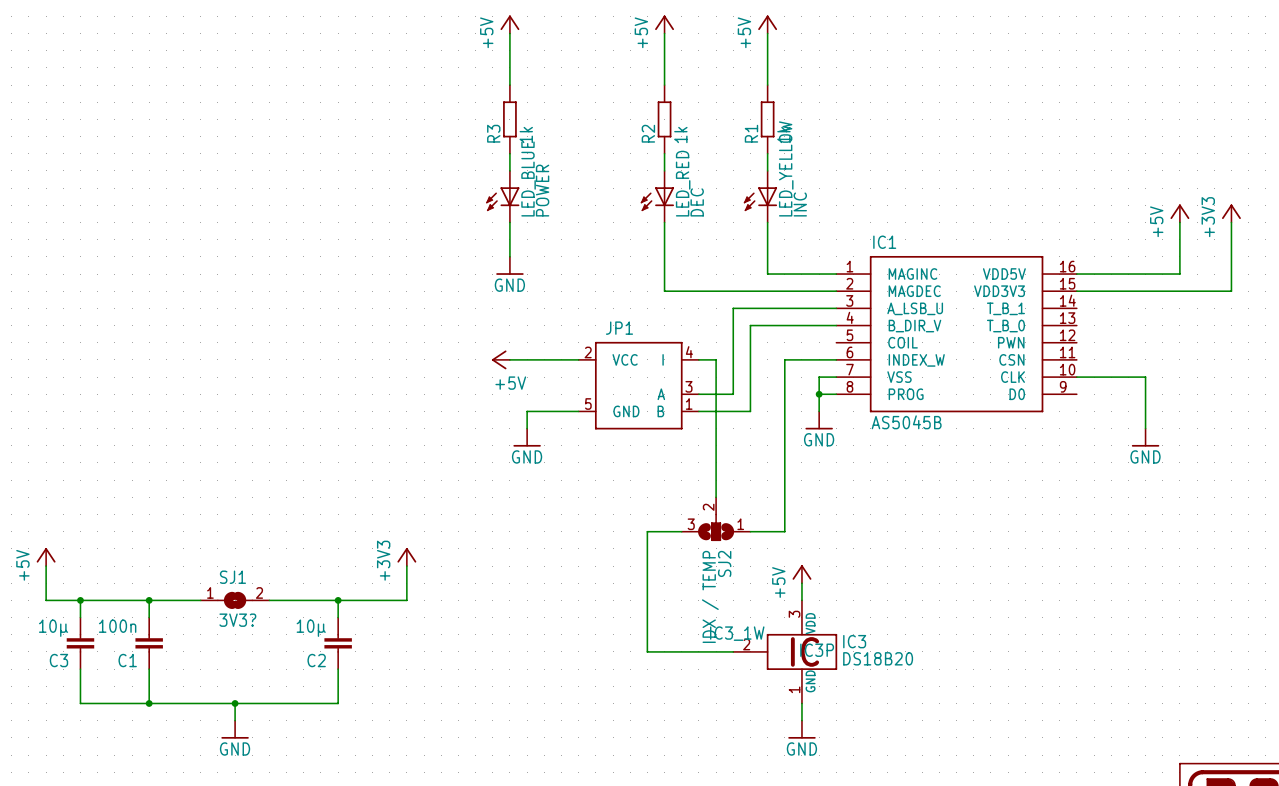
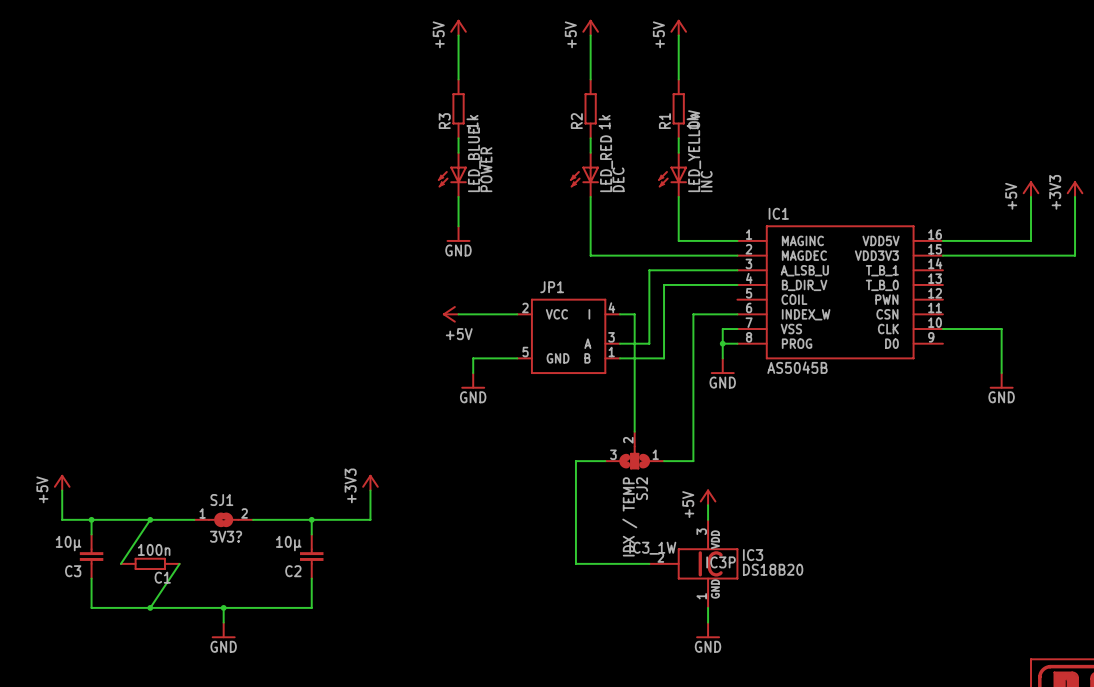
wire: (149, 600) (149, 617) -> (150, 519) (120, 563)
C1 symbol: [135, 617, 163, 670] -> [120, 558, 180, 570]
C1 value position: 100n (117, 626) -> 100n (154, 549)
C1 name position: C1 (127, 660) -> C1 (162, 577)
wire: (149, 669) (149, 703) -> (179, 563) (150, 607)

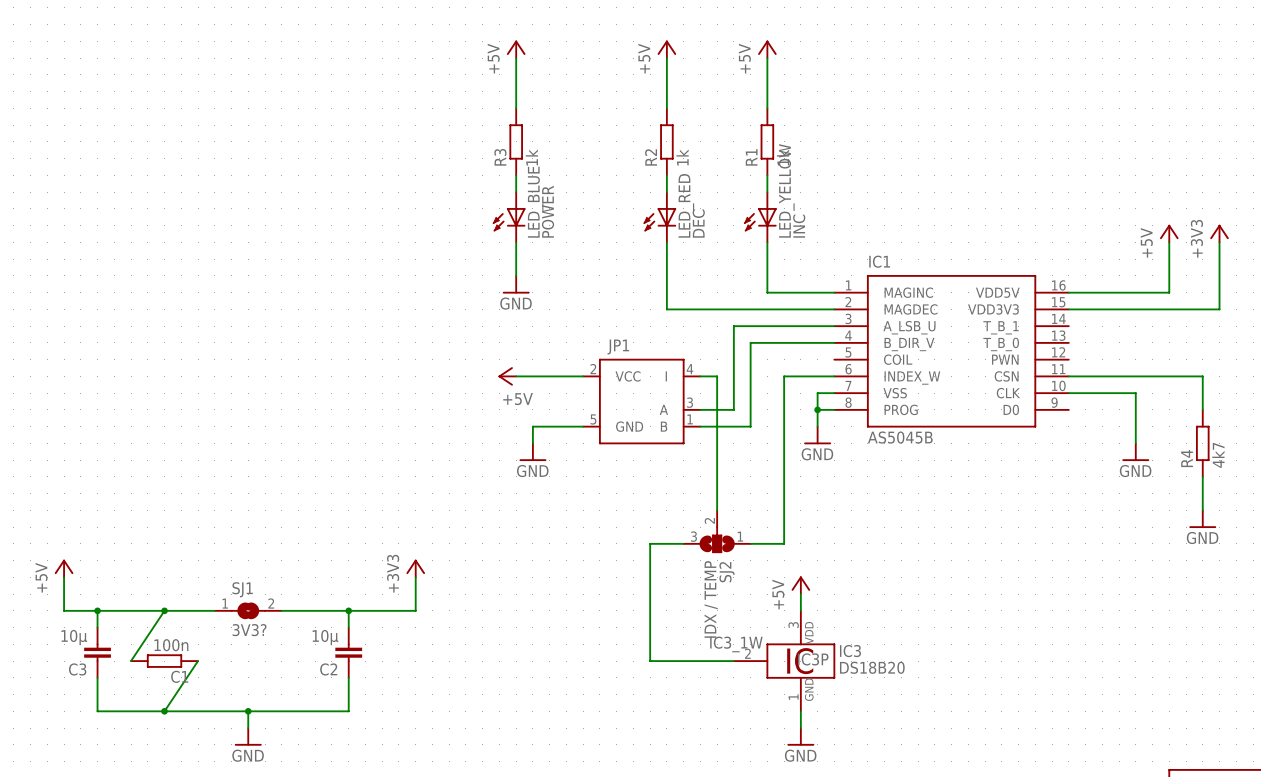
wire: none -> (1068, 376) (1202, 376) (1202, 409)
R4: none -> 4k7 (1202, 443)
wire: none -> (1202, 476) (1202, 510)
power symbol: none -> GND (1202, 519)

